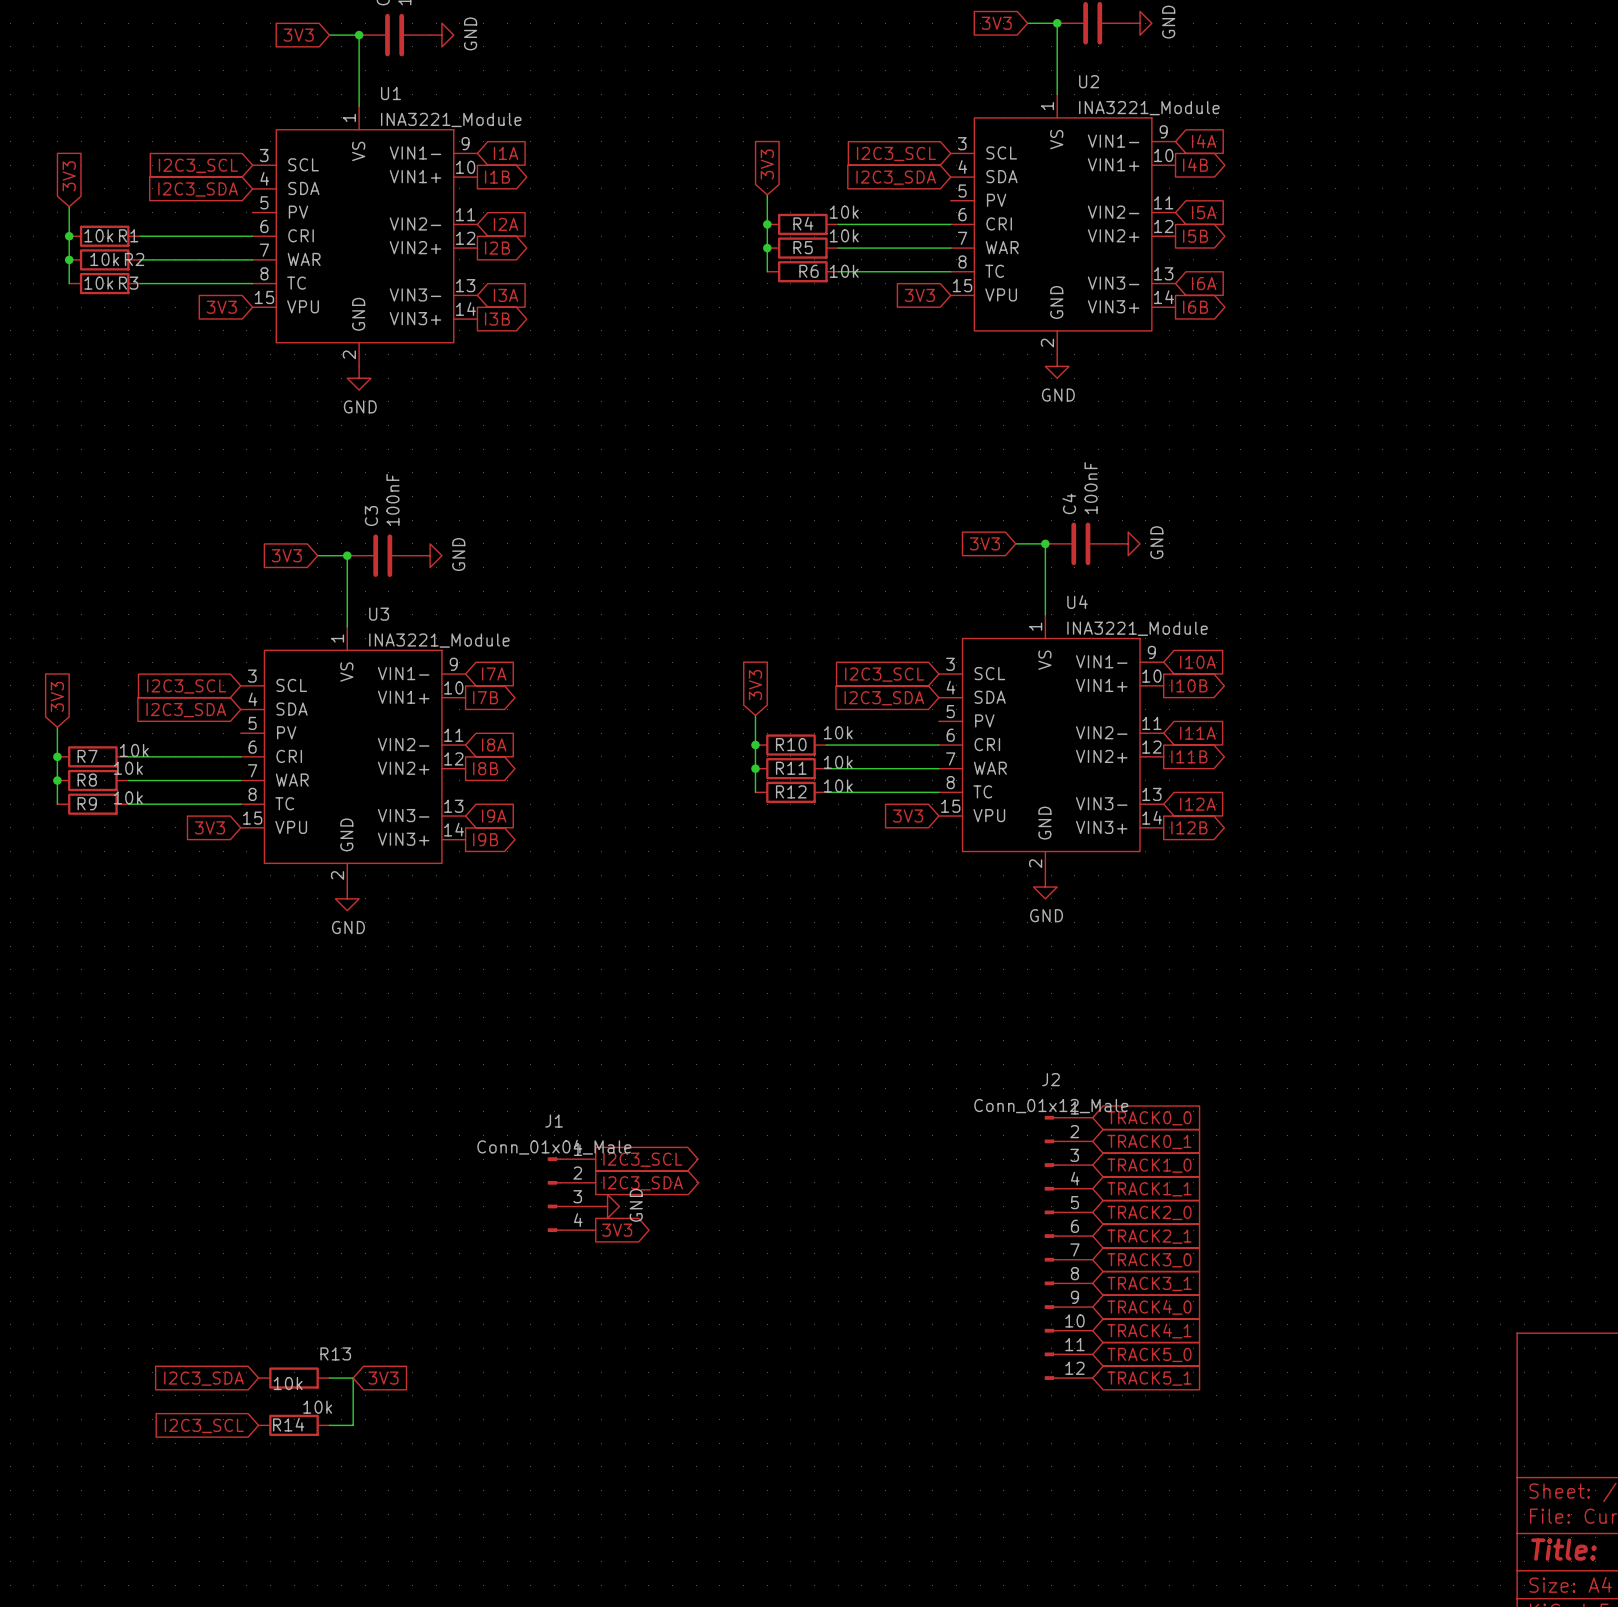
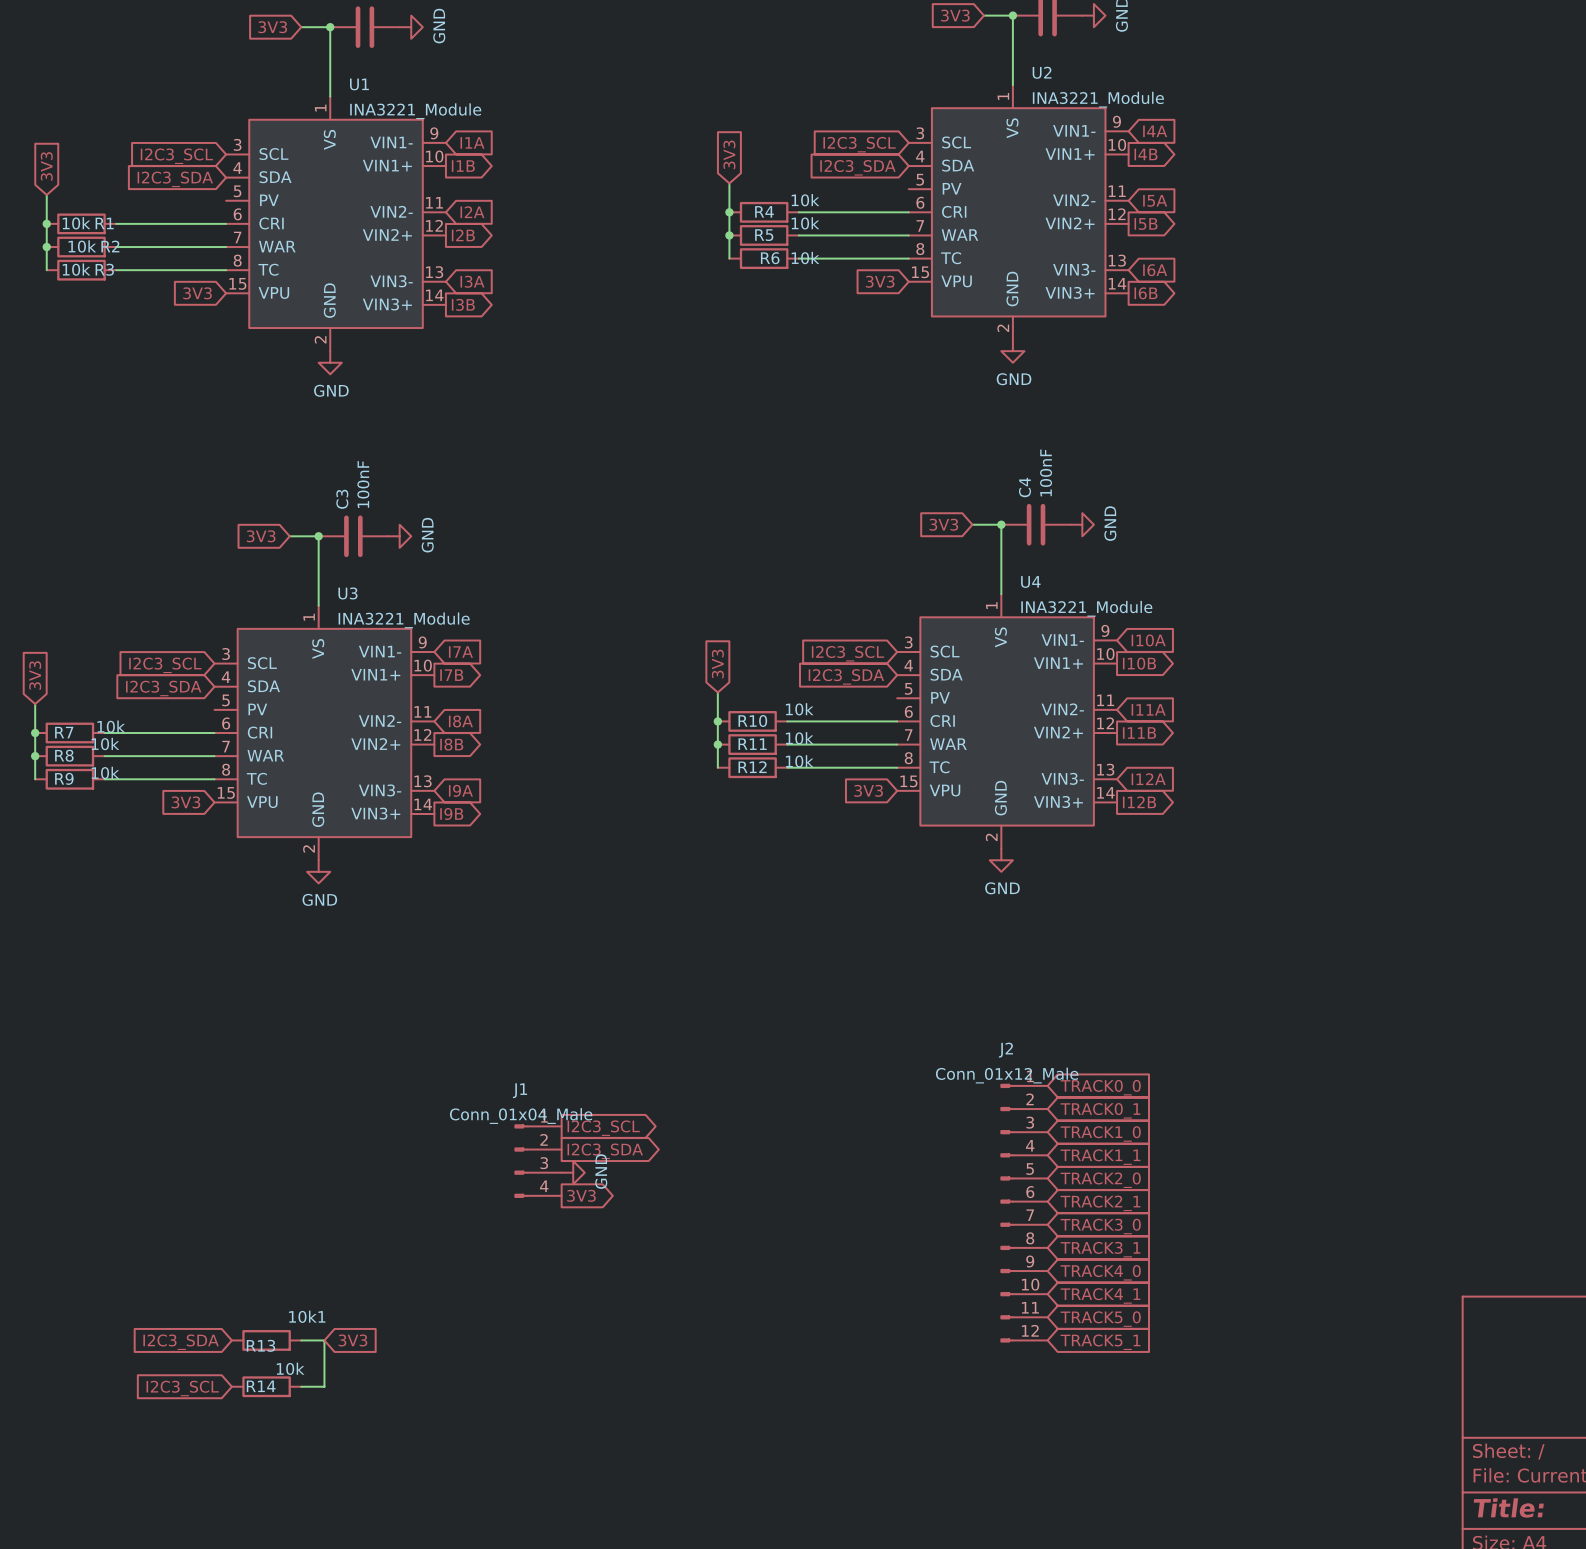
R13 name: R13 (335, 1353) -> 10k1 (307, 1316)
R13 value: 10k (288, 1383) -> R13 (260, 1345)

